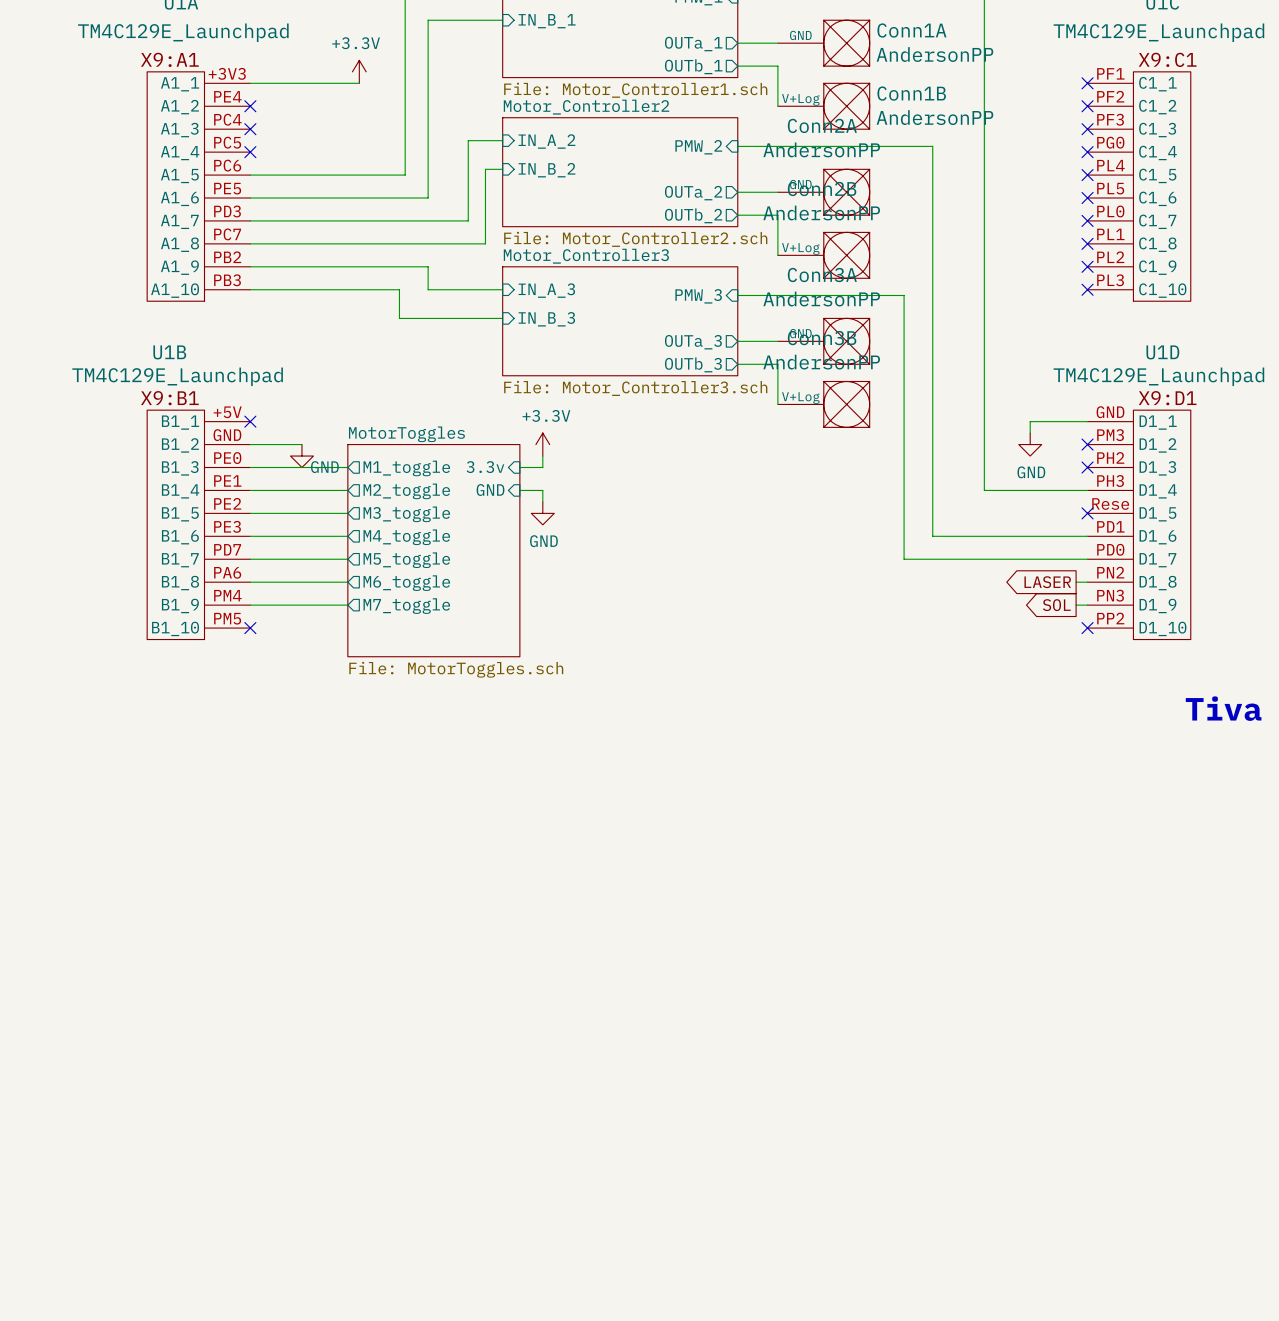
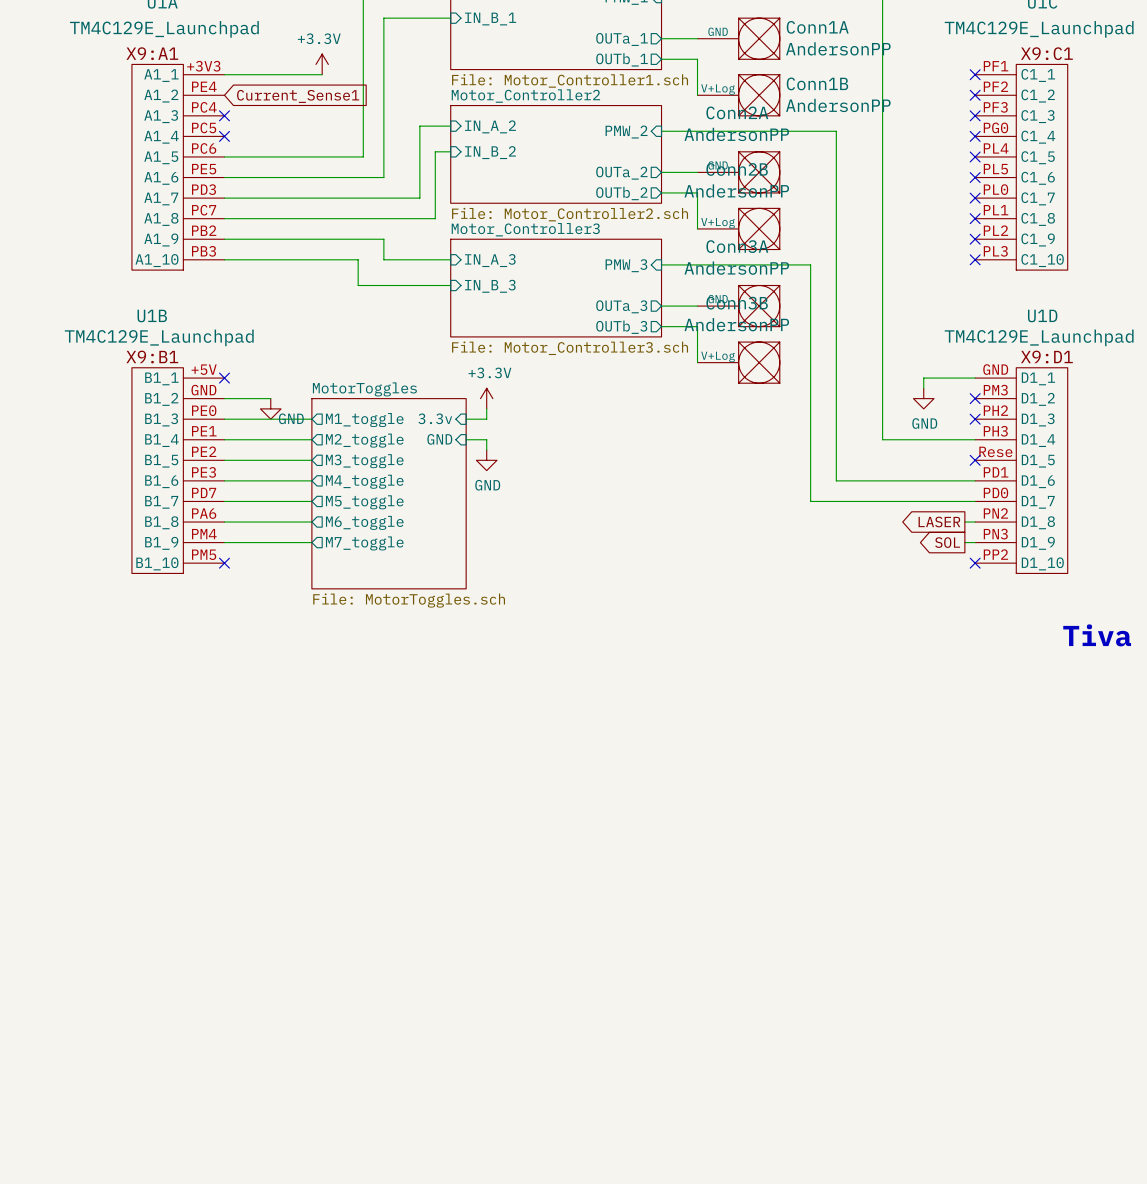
no-connect mark: (250, 106) -> none
global label: none -> Current_Sense1 (298, 96)

